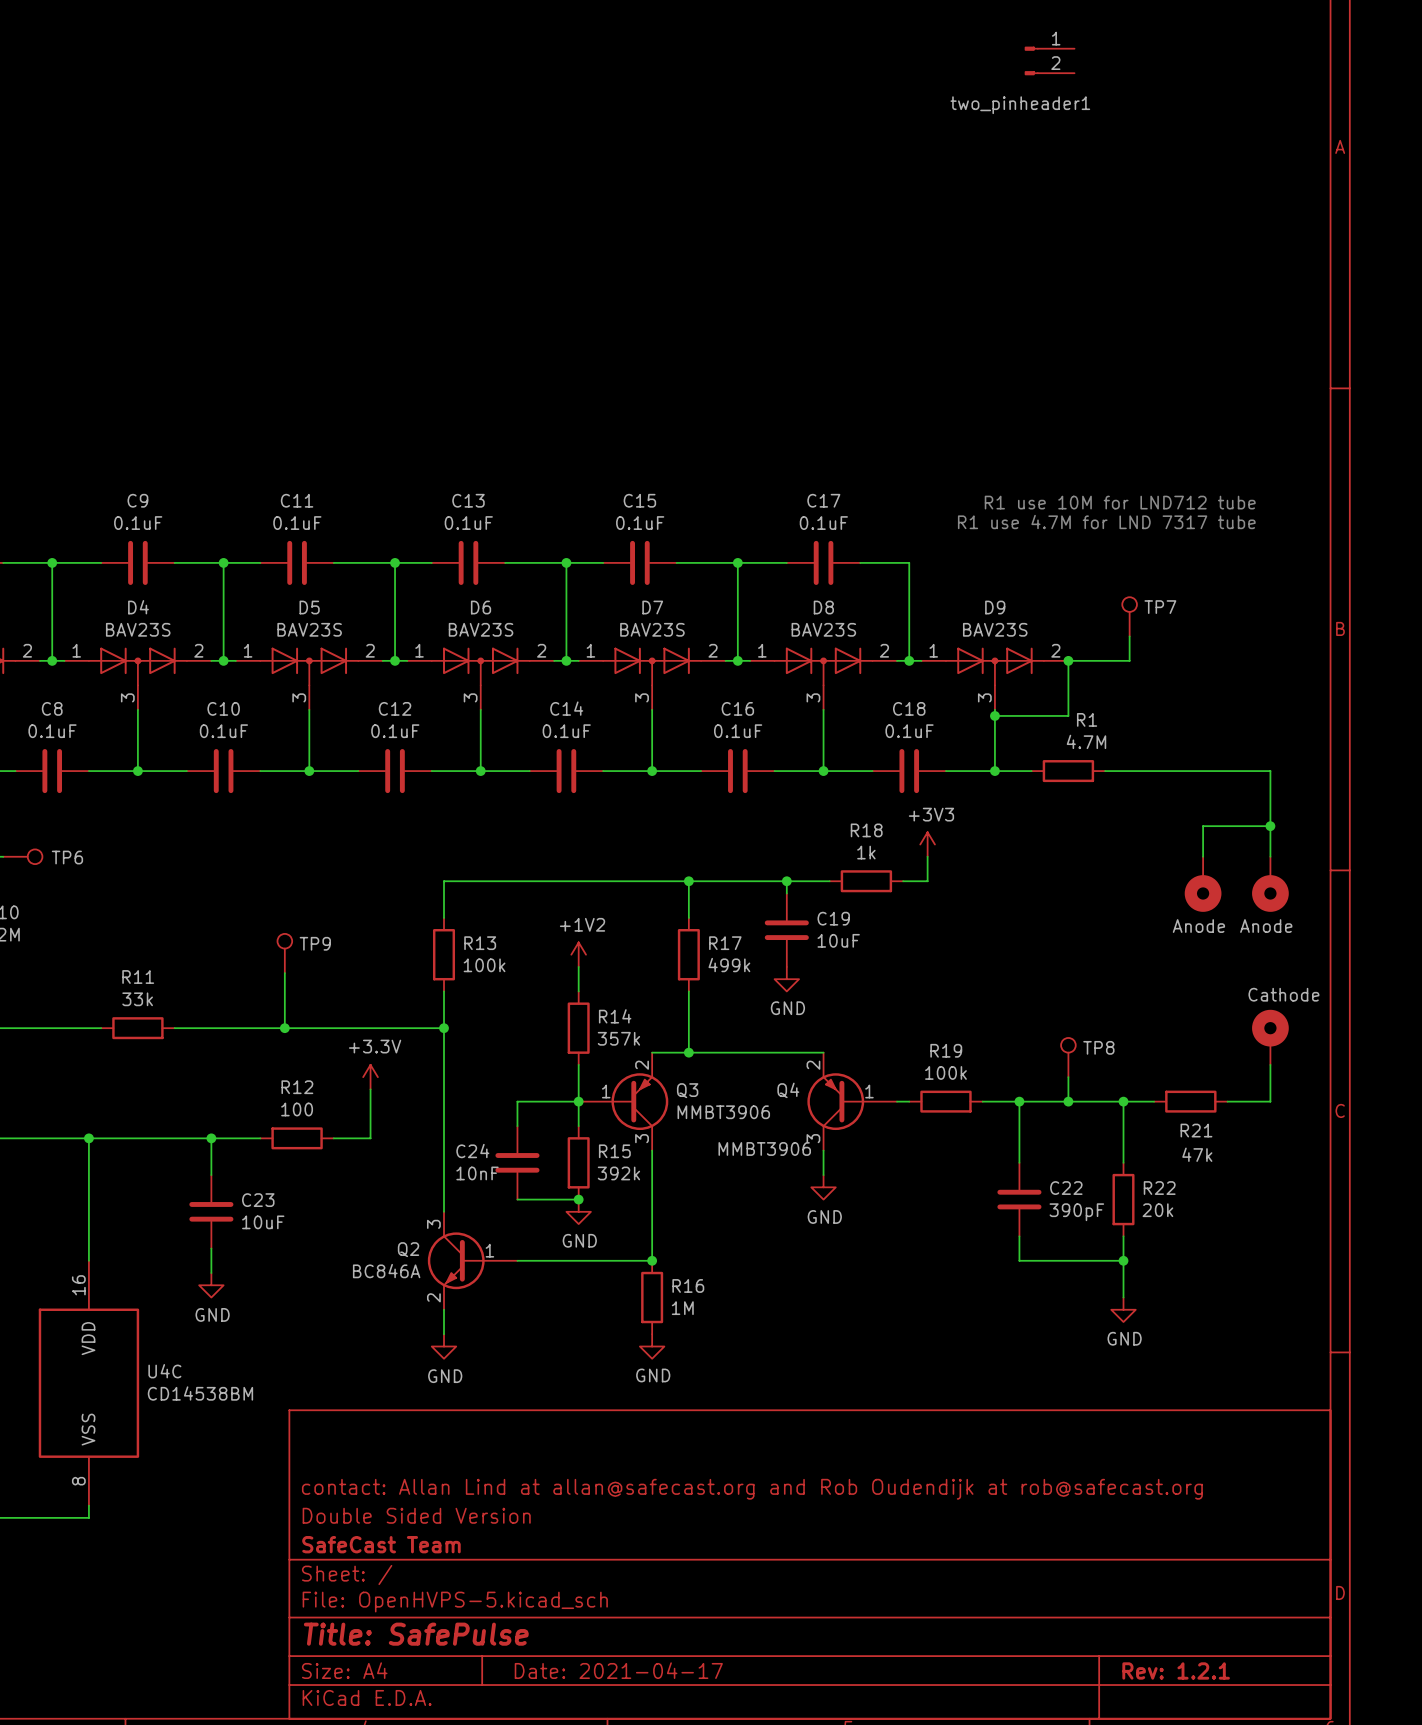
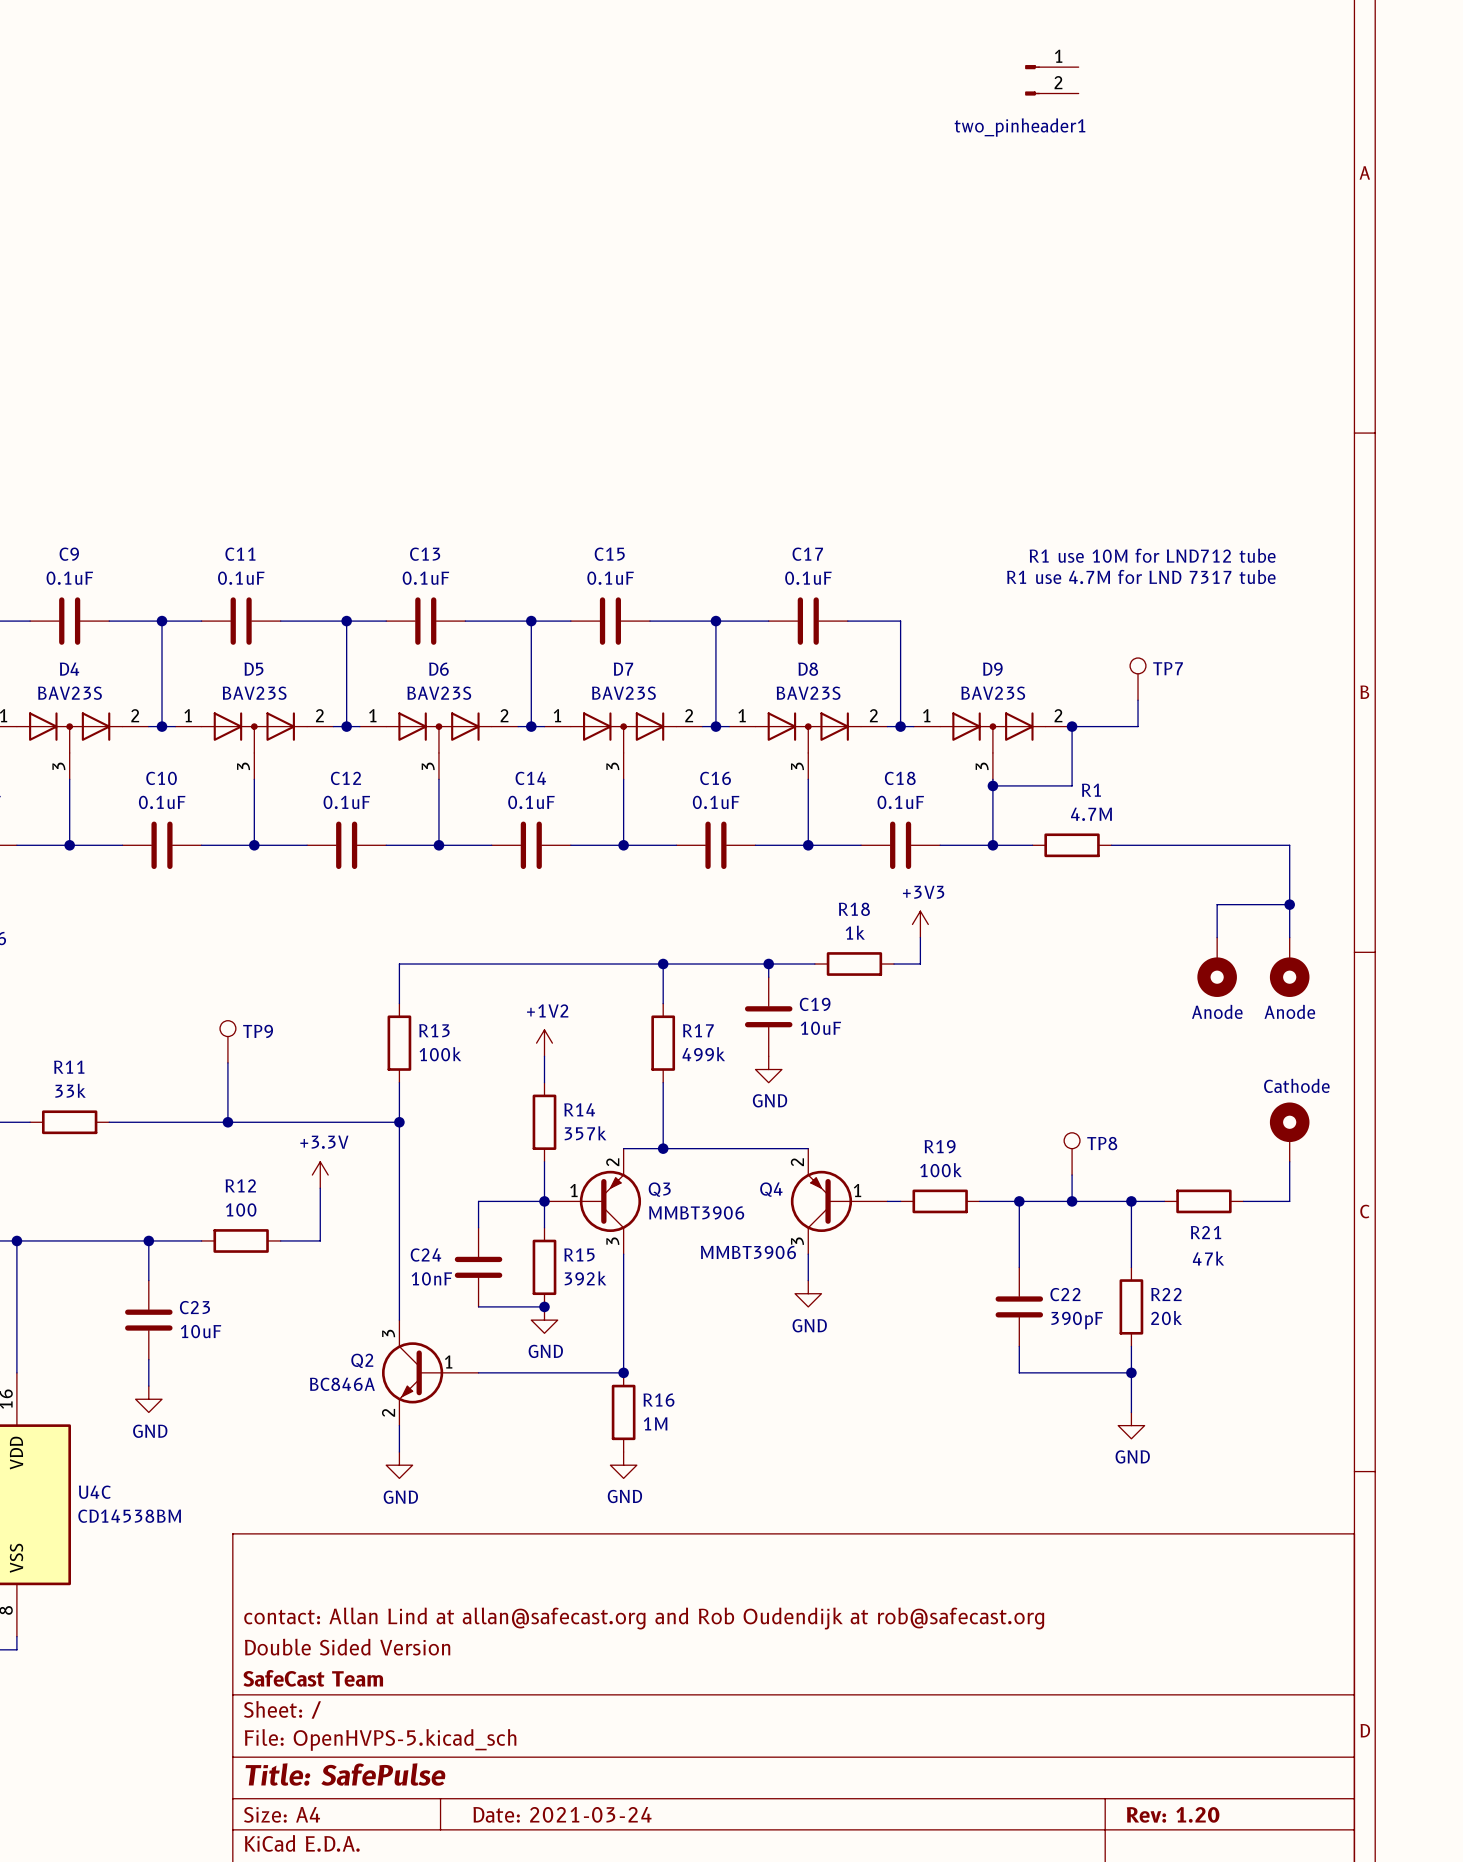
title block: Date: 2021-04-17 (618, 1670) -> Date: 2021-03-24 (562, 1814)
title block: Rev: 1.2.1 (1176, 1670) -> Rev: 1.20 (1173, 1814)

